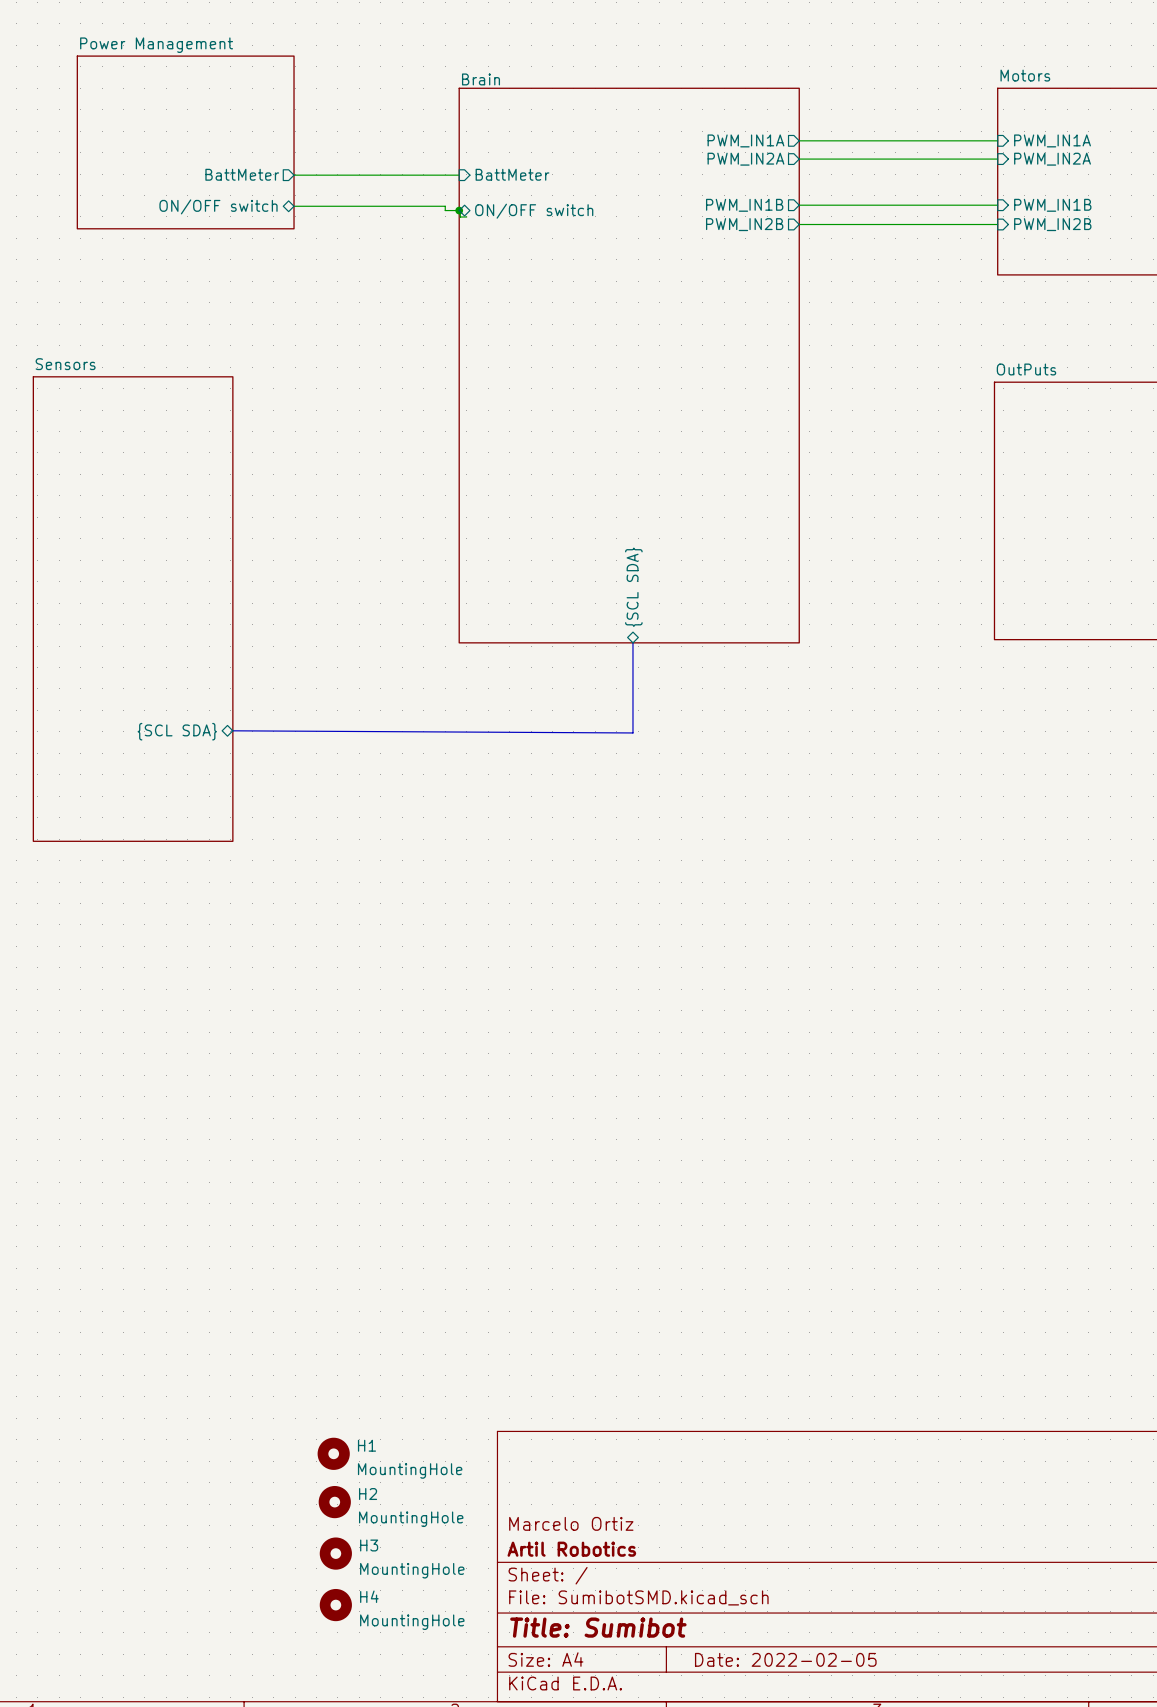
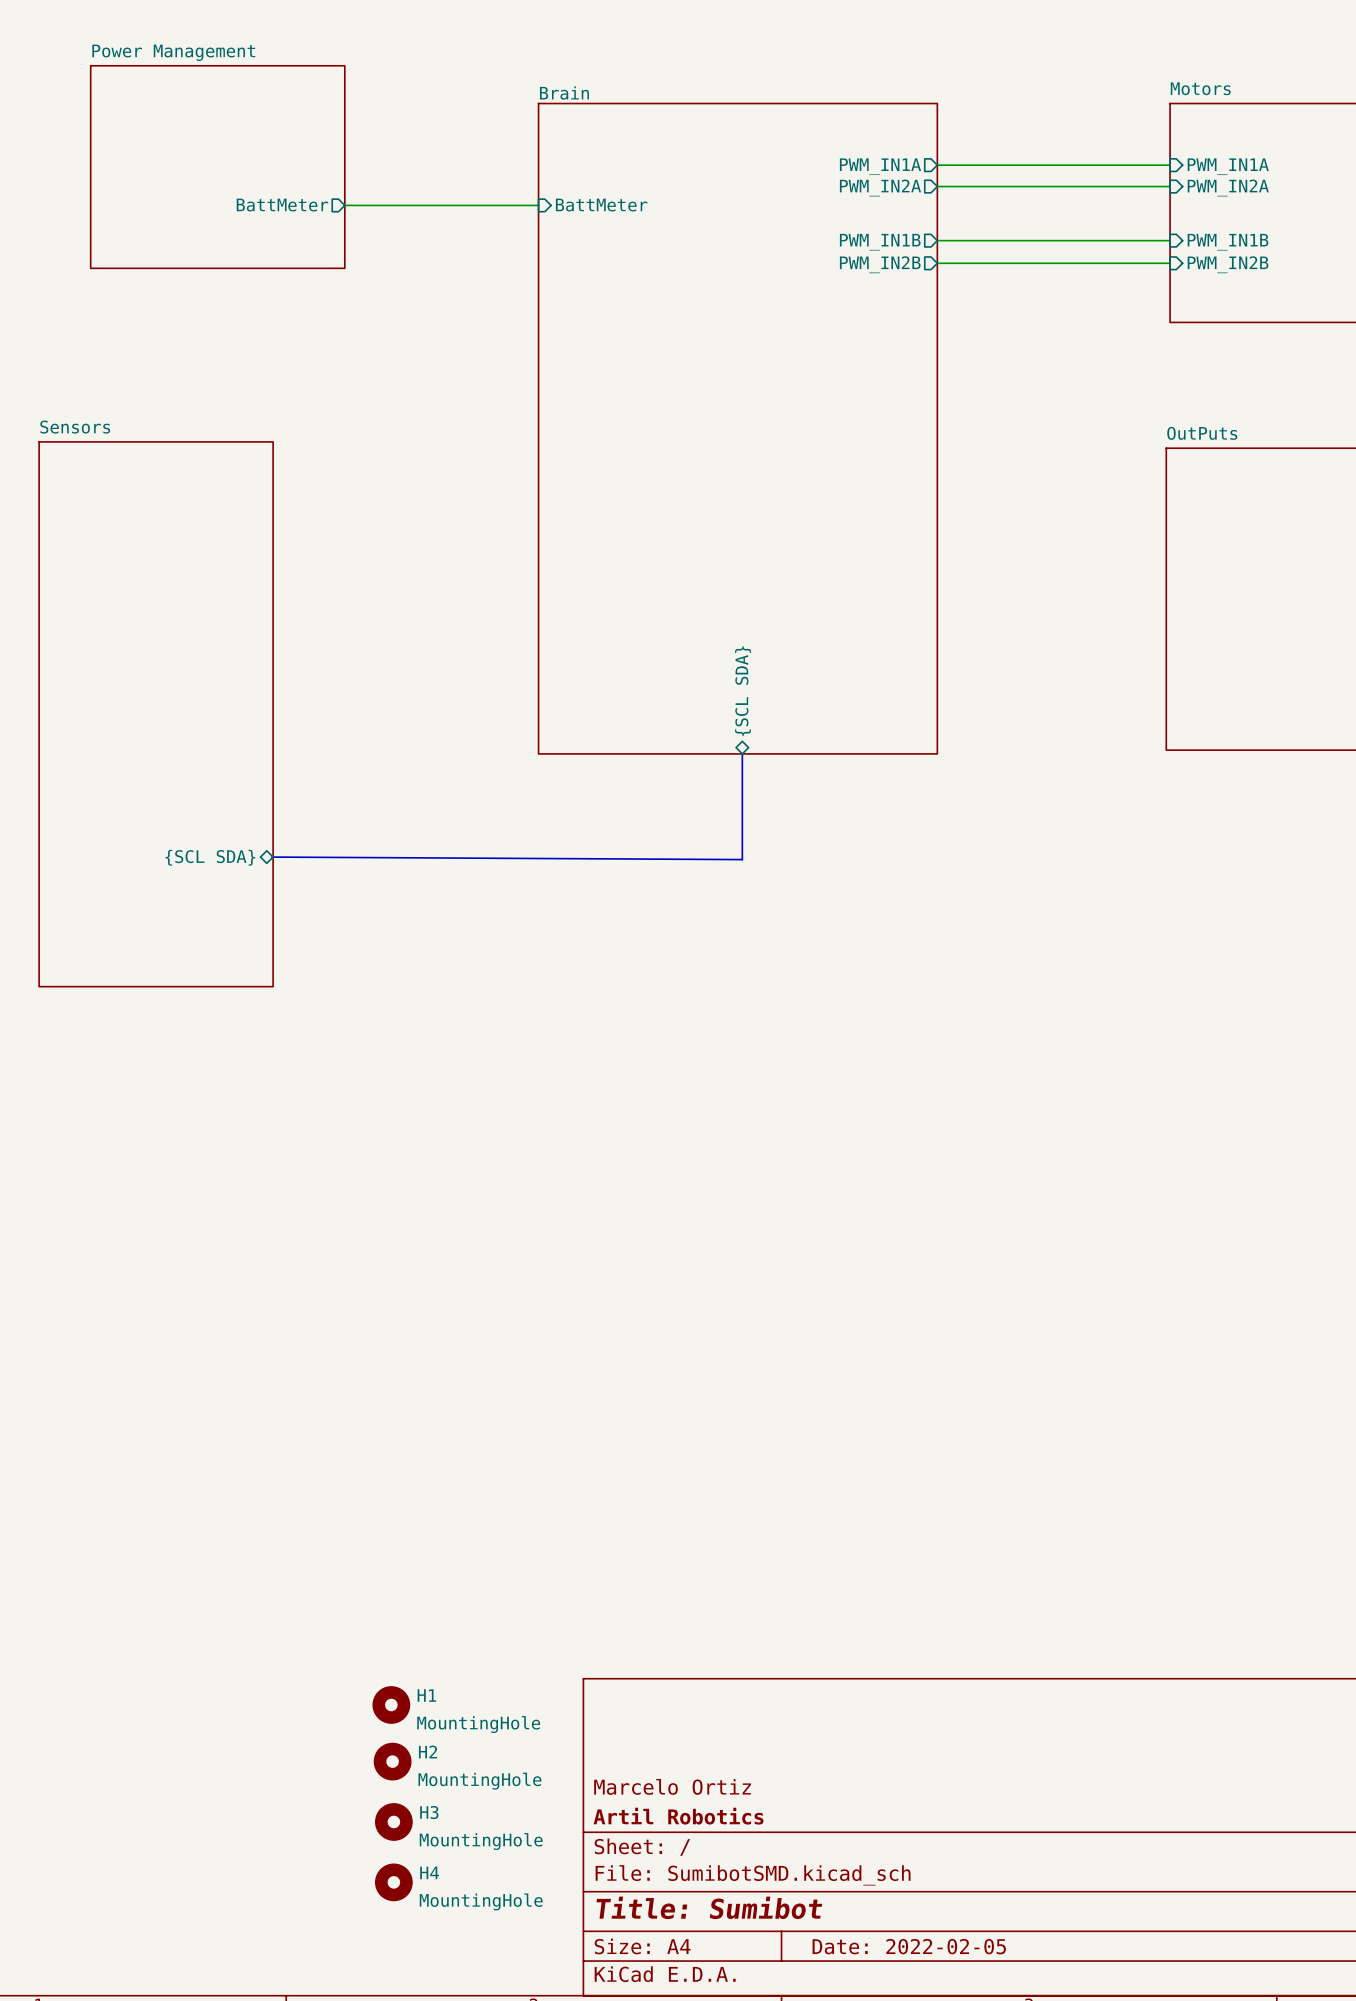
sheet pin: ON/OFF switch (218, 206) -> none
wire: (295, 206) (445, 206) (445, 210) (460, 210) (460, 216) (466, 216) -> none
junction: (459, 210) -> none
sheet pin: ON/OFF switch (534, 211) -> none

